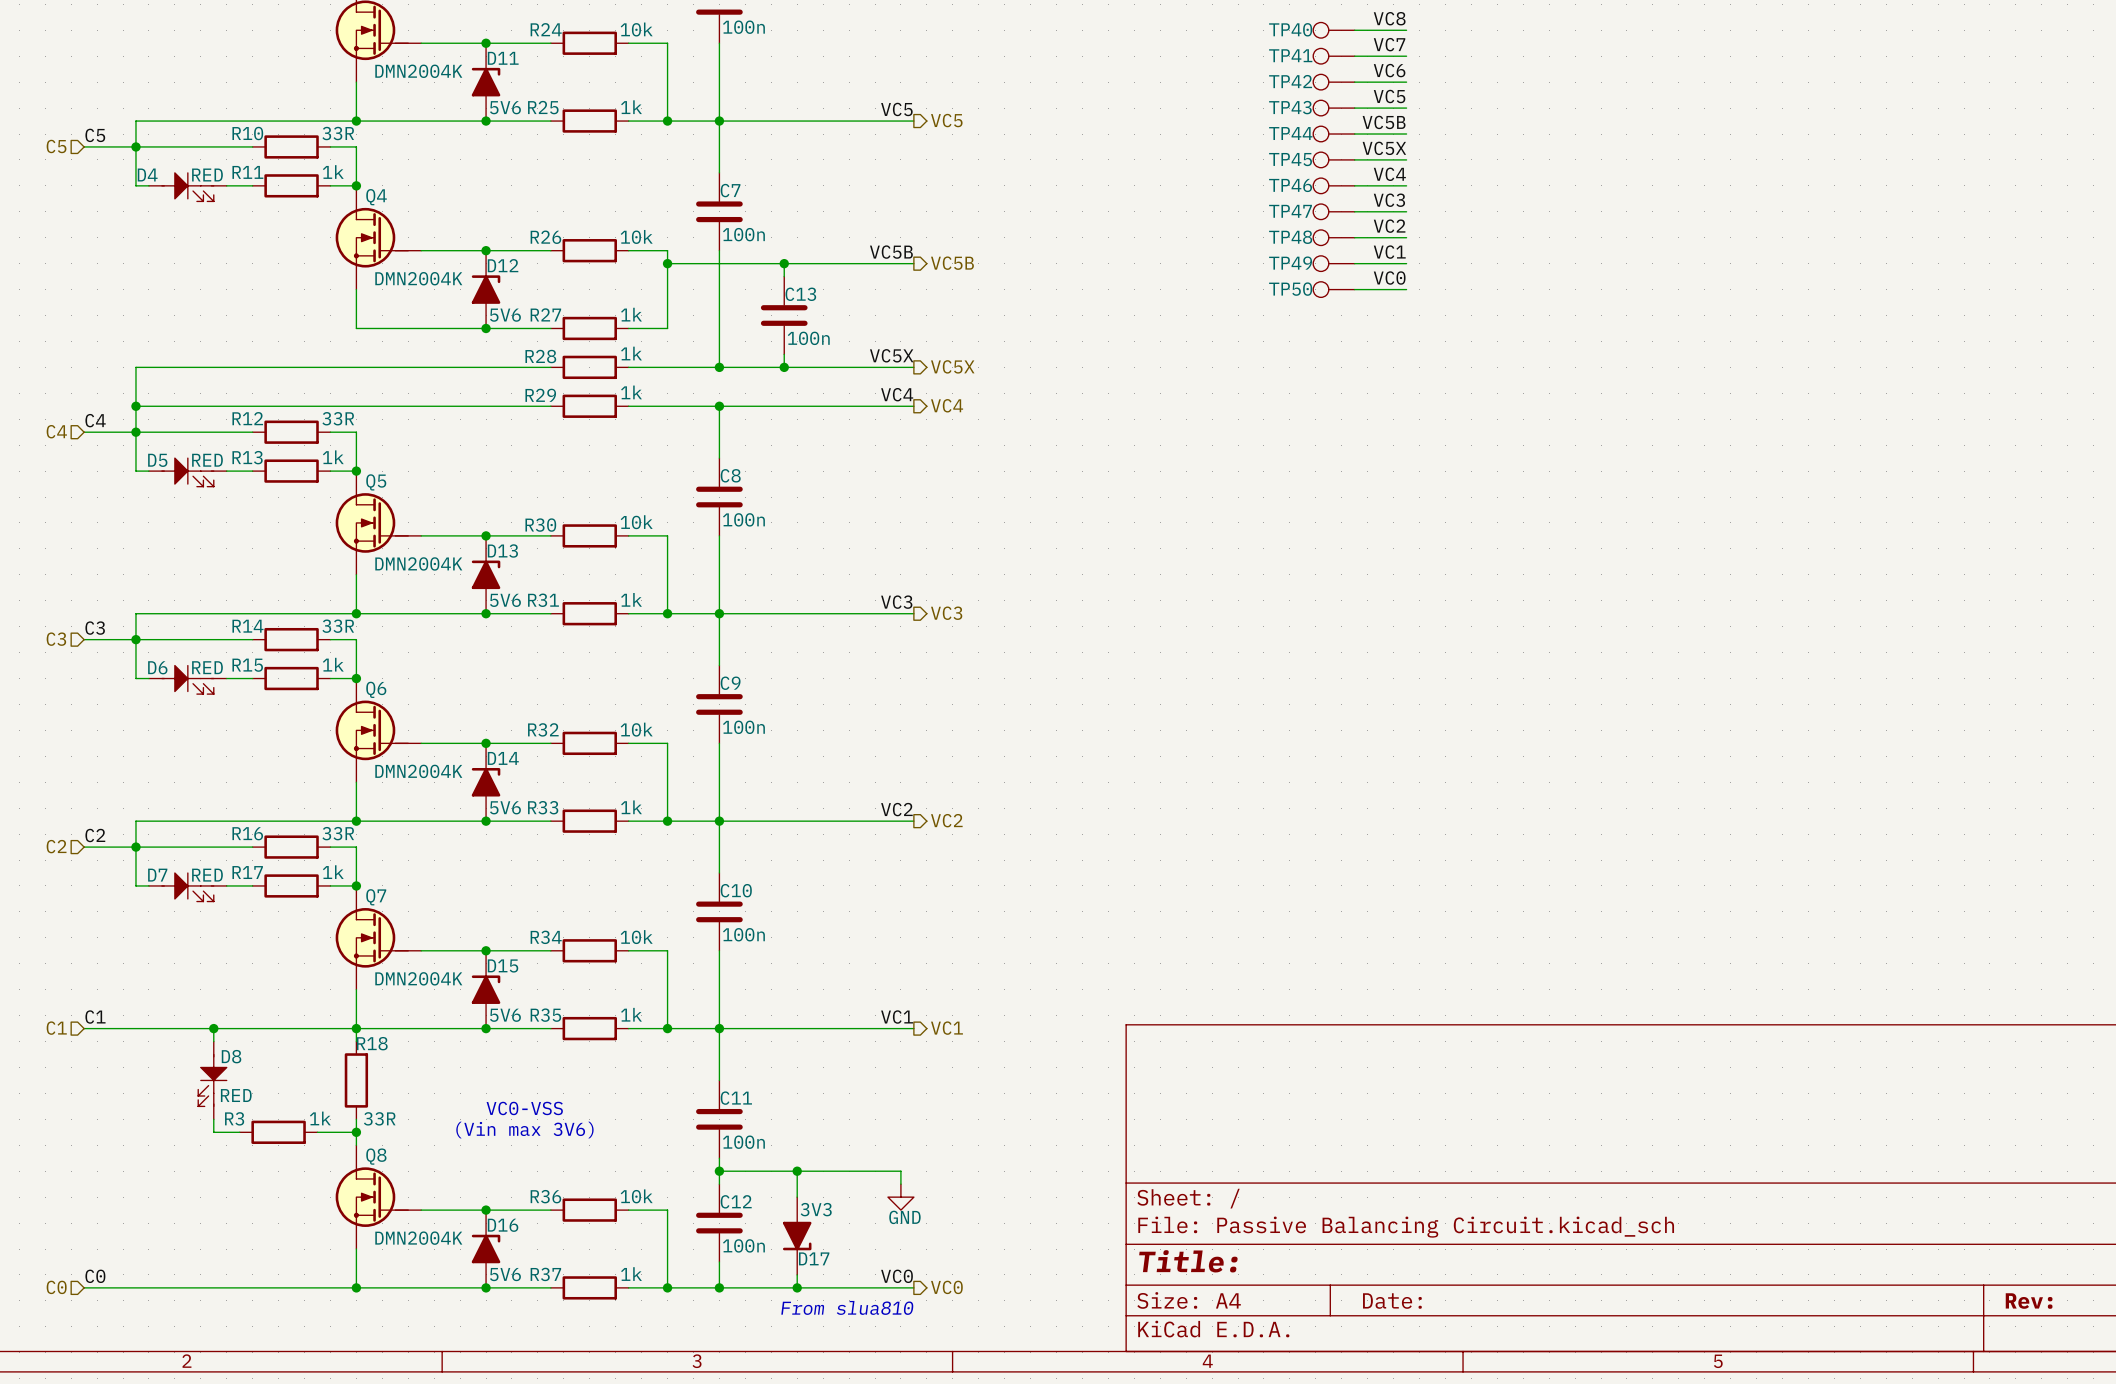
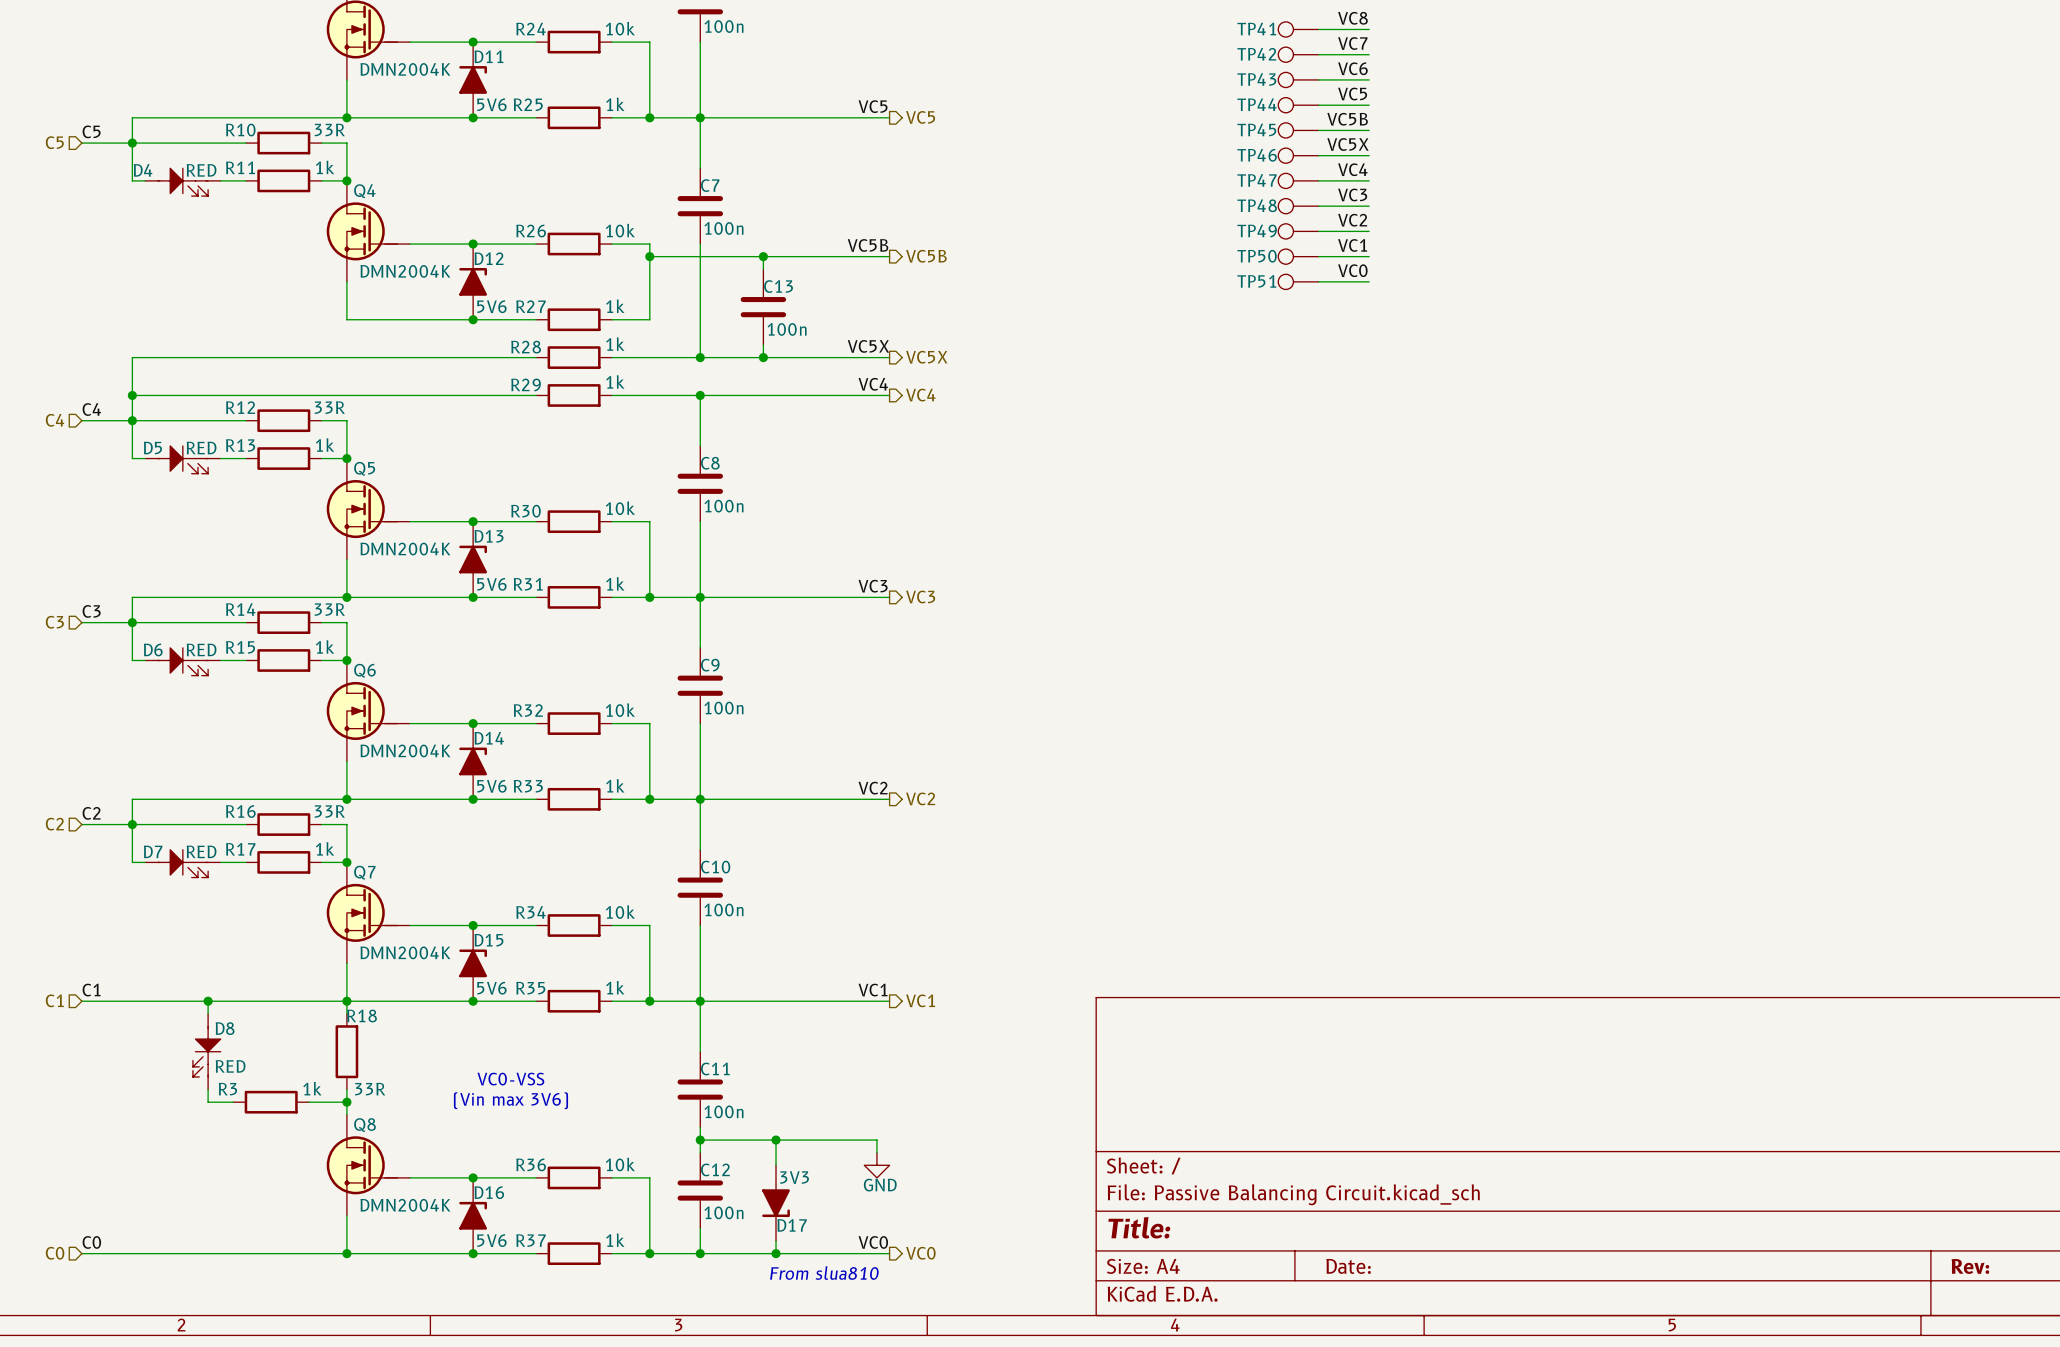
TP40 name: TP40 (1290, 29) -> TP41 (1256, 29)
TP41 name: TP41 (1290, 55) -> TP42 (1256, 54)
TP42 name: TP42 (1290, 81) -> TP43 (1256, 79)
TP43 name: TP43 (1290, 107) -> TP44 (1257, 104)
TP44 name: TP44 (1290, 133) -> TP45 (1256, 129)
TP45 name: TP45 (1290, 159) -> TP46 (1257, 155)
TP46 name: TP46 (1290, 185) -> TP47 (1257, 180)
TP47 name: TP47 (1290, 211) -> TP48 (1257, 205)
TP48 name: TP48 (1290, 237) -> TP49 (1257, 231)
TP49 name: TP49 (1290, 263) -> TP50 (1257, 256)
TP50 name: TP50 (1290, 289) -> TP51 (1256, 281)

